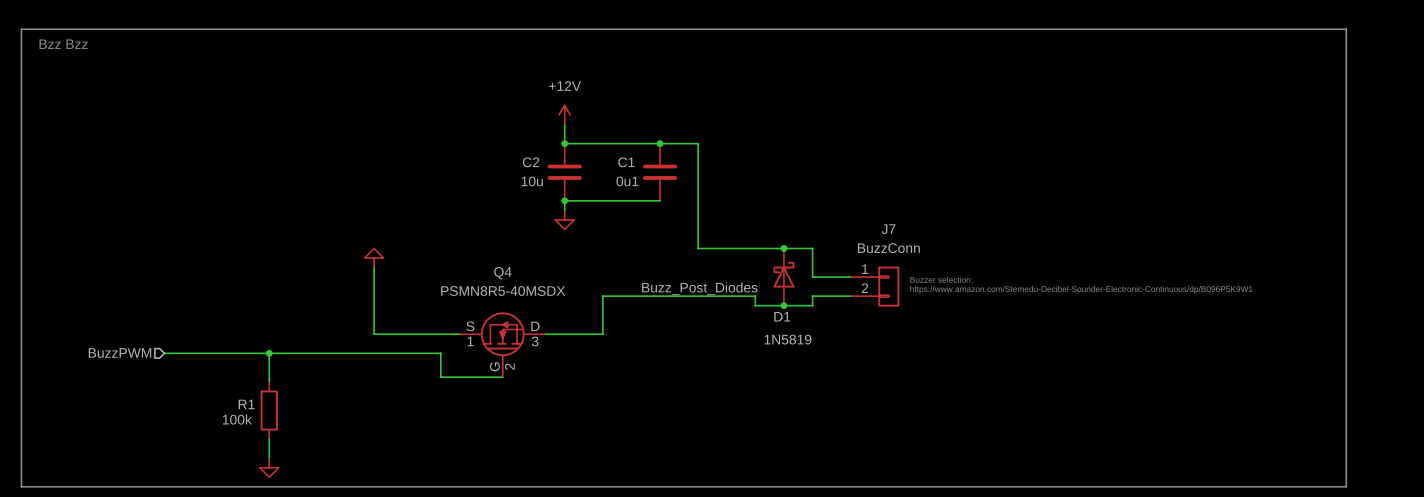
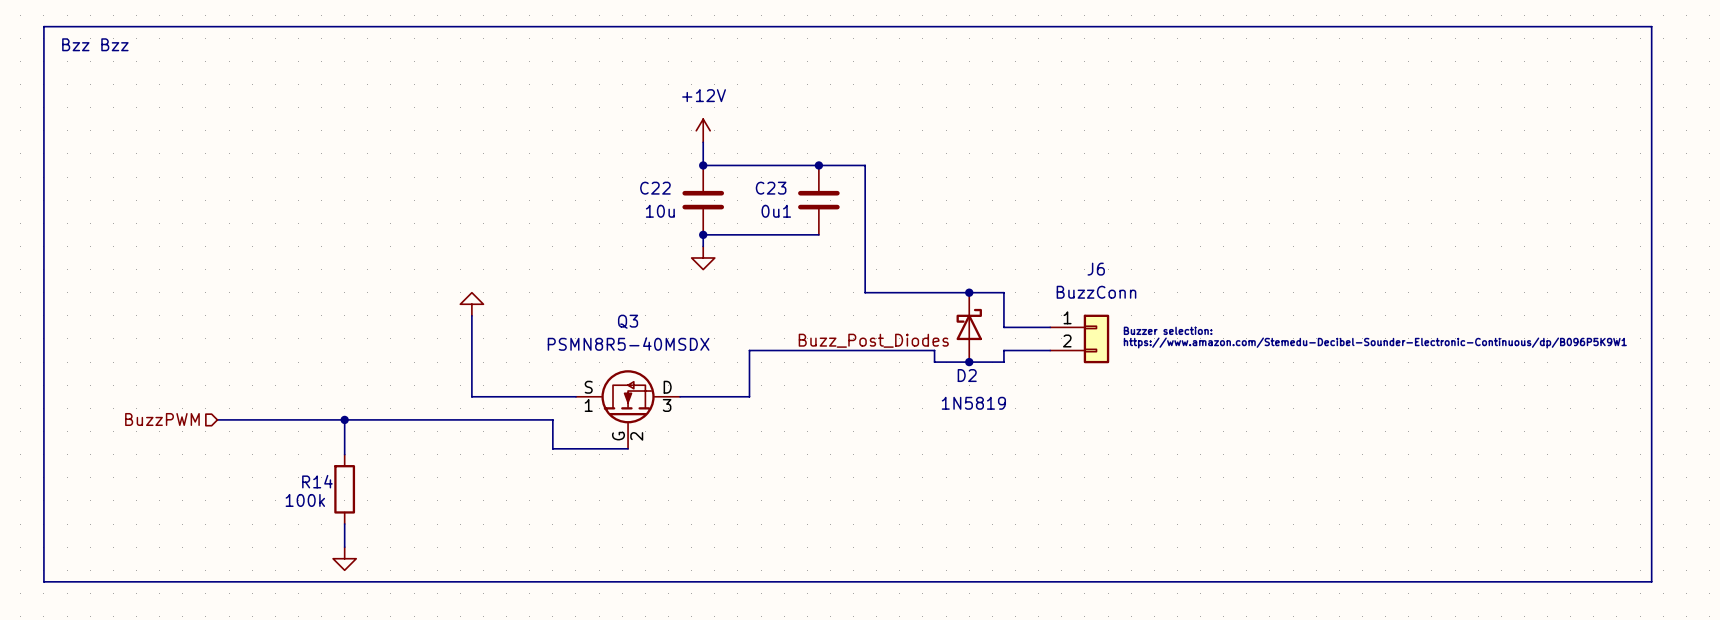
C2 name: C2 (531, 162) -> C22 (655, 188)
C1 name: C1 (626, 162) -> C23 (771, 188)
J7 name: J7 (888, 229) -> J6 (1096, 269)
Q4 name: Q4 (502, 273) -> Q3 (628, 321)
D1 name: D1 (782, 316) -> D2 (967, 375)
R1 name: R1 (246, 404) -> R14 (317, 481)

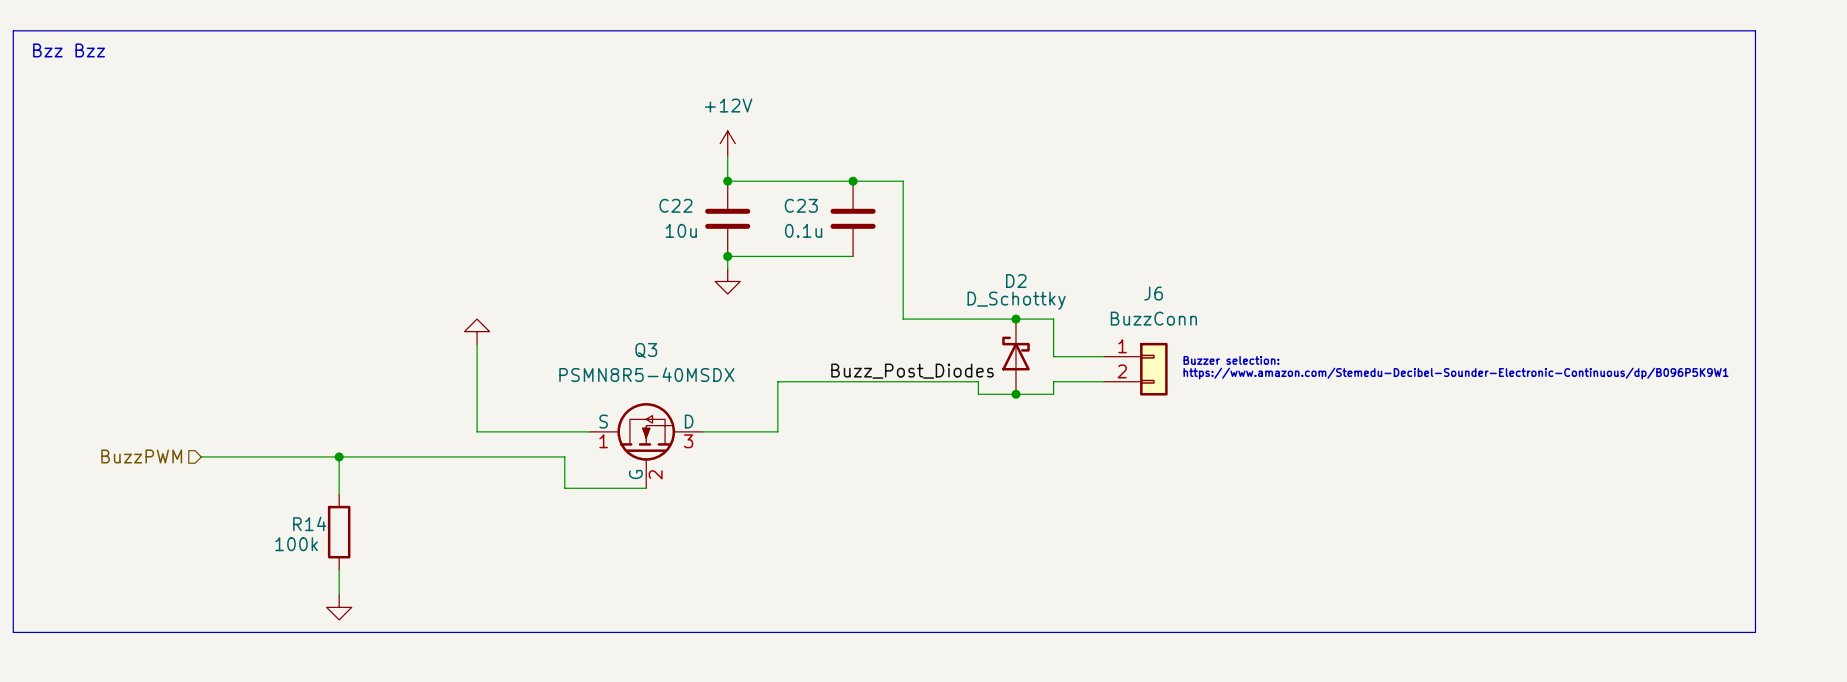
C23 value: 0u1 (776, 211) -> 0.1u (803, 230)
D2 flip: as is (969, 324) -> left-right (1015, 353)
D2 name position: D2 (967, 375) -> D2 (1016, 281)
D2 value: 1N5819 (973, 403) -> D_Schottky (1016, 300)

